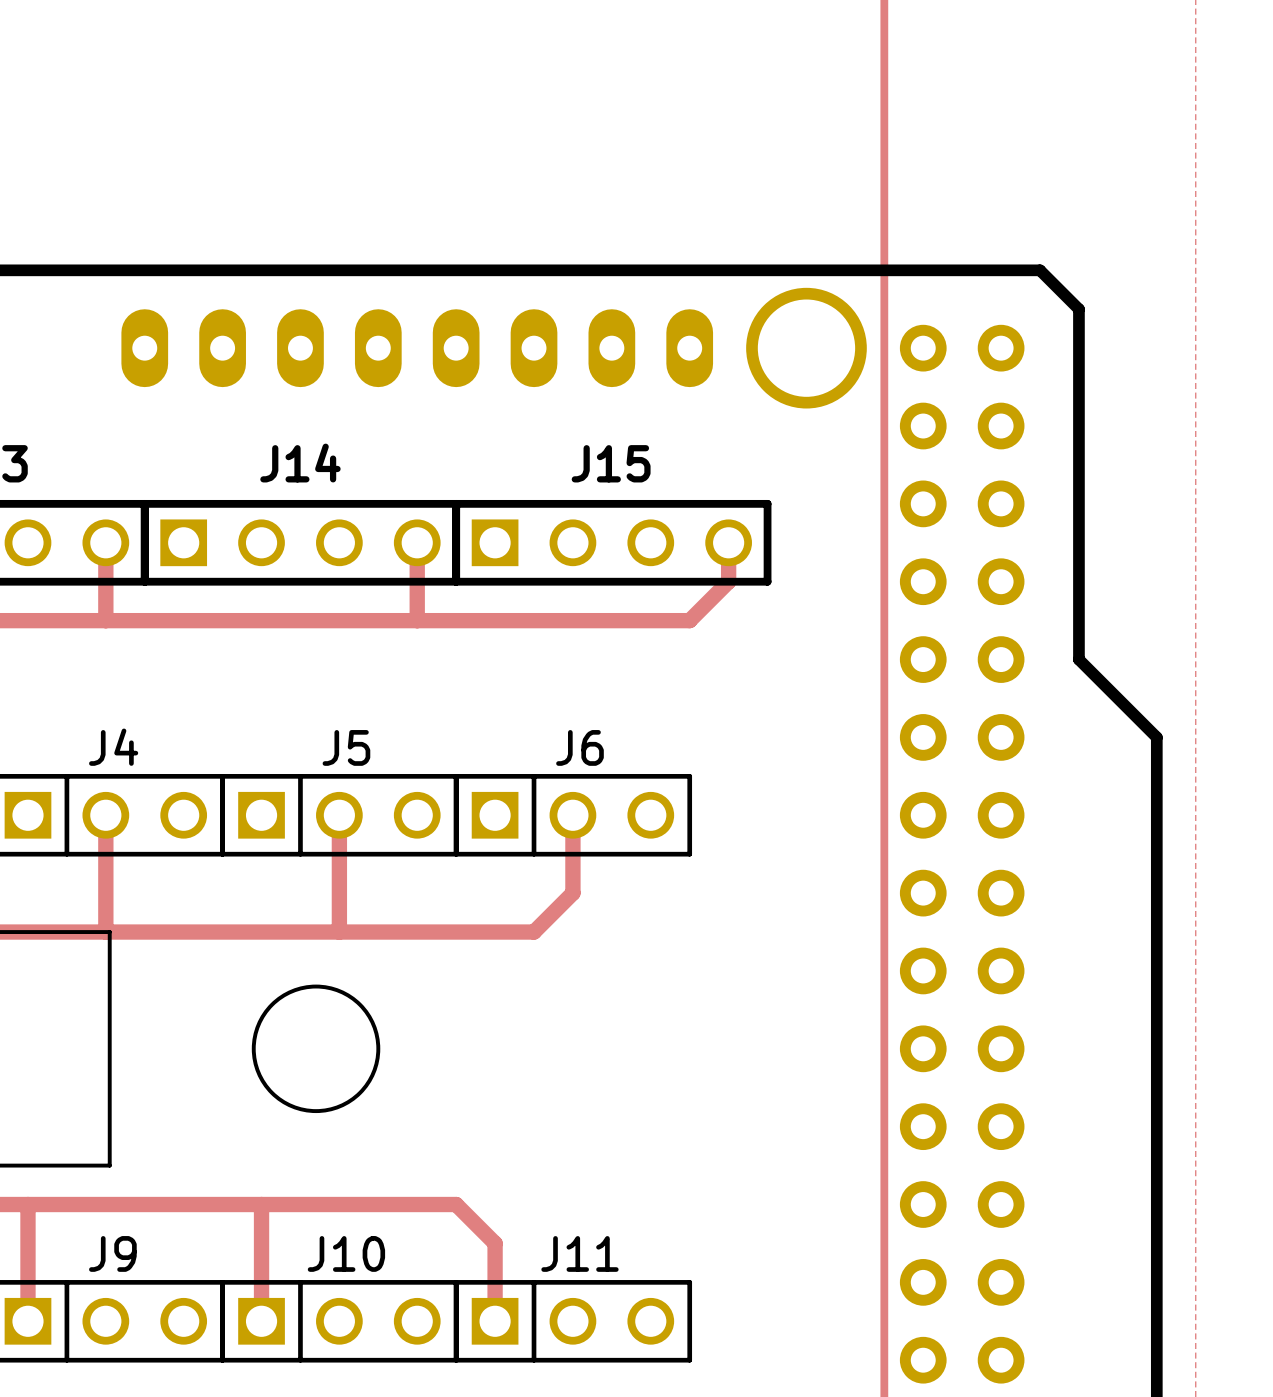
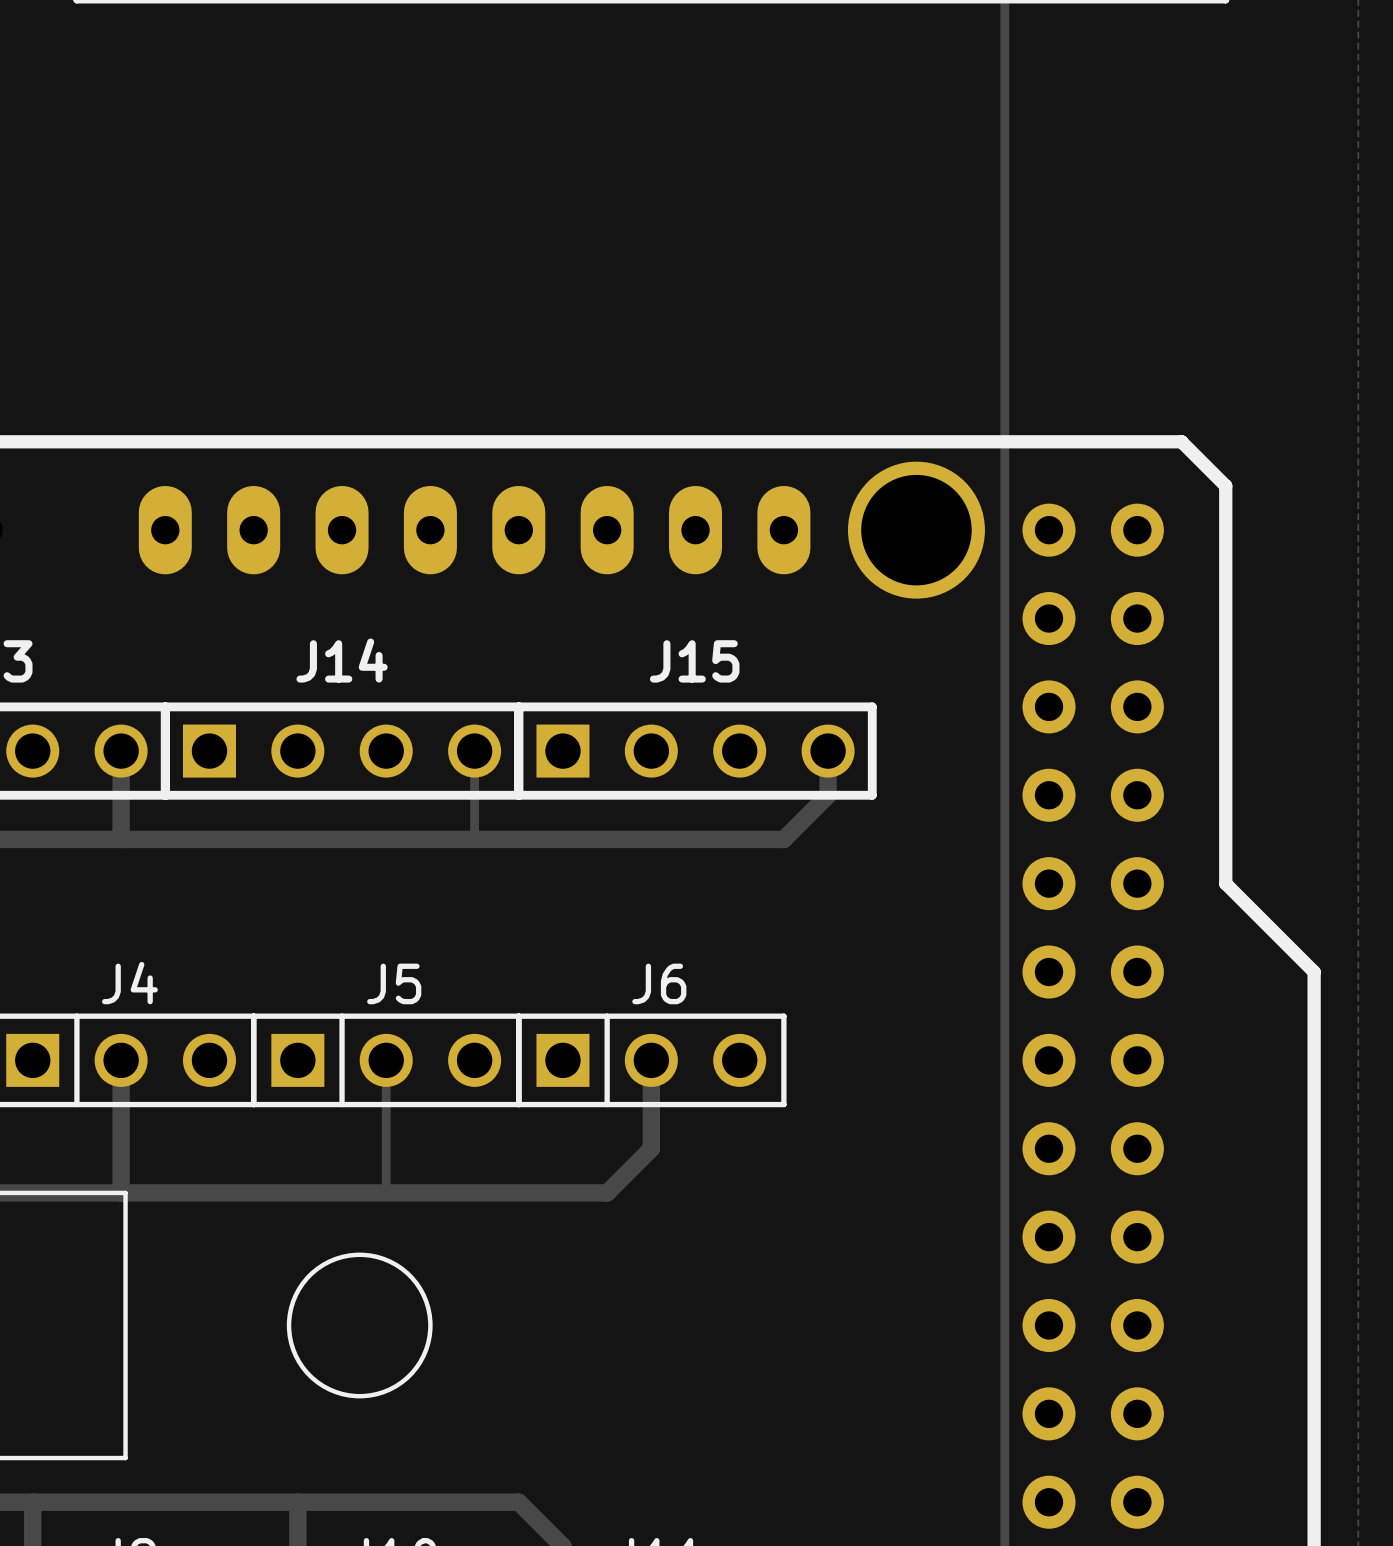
track width: thick (417, 542) (417, 620) -> thin (474, 751) (474, 839)
track width: thick (339, 815) (339, 932) -> thin (386, 1060) (386, 1192)

